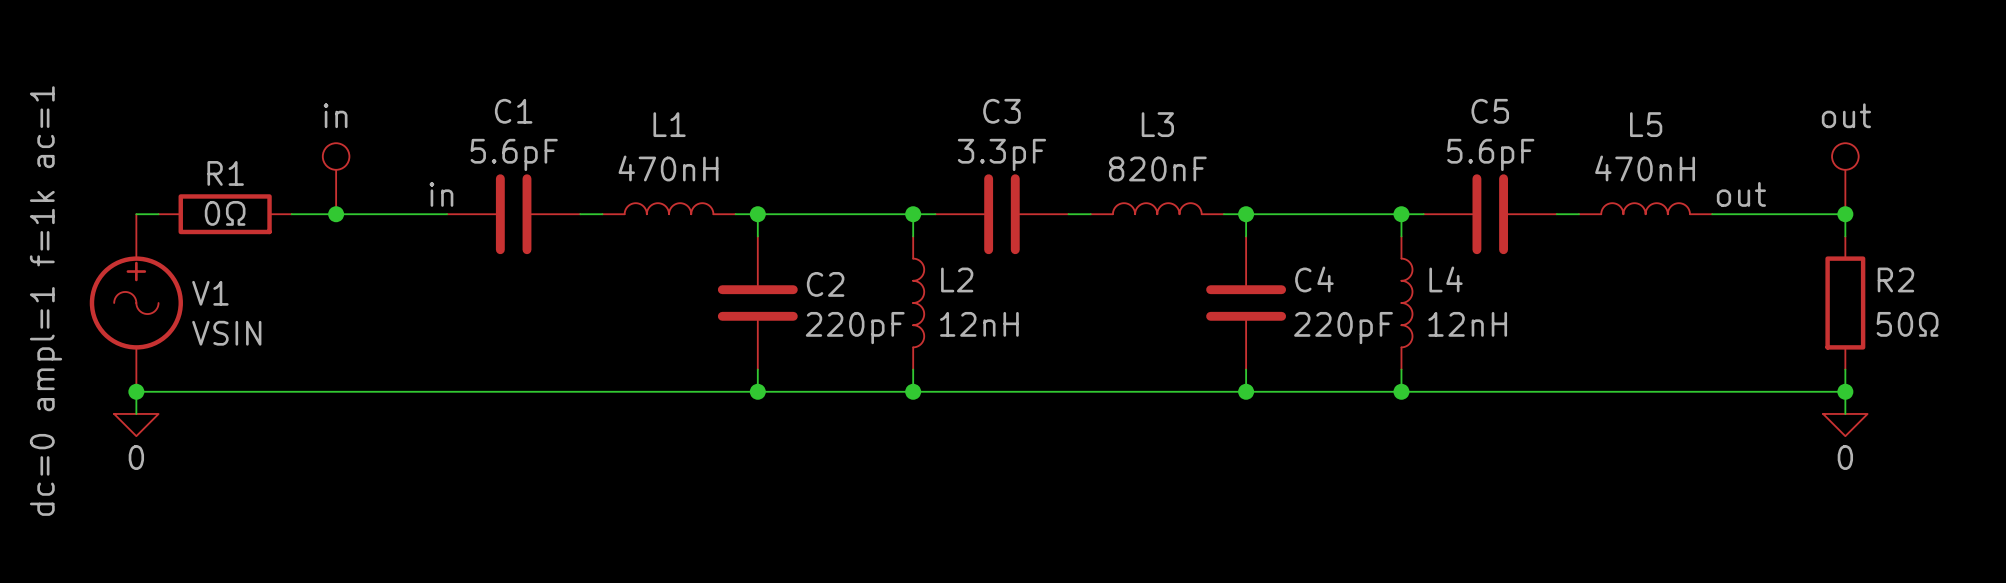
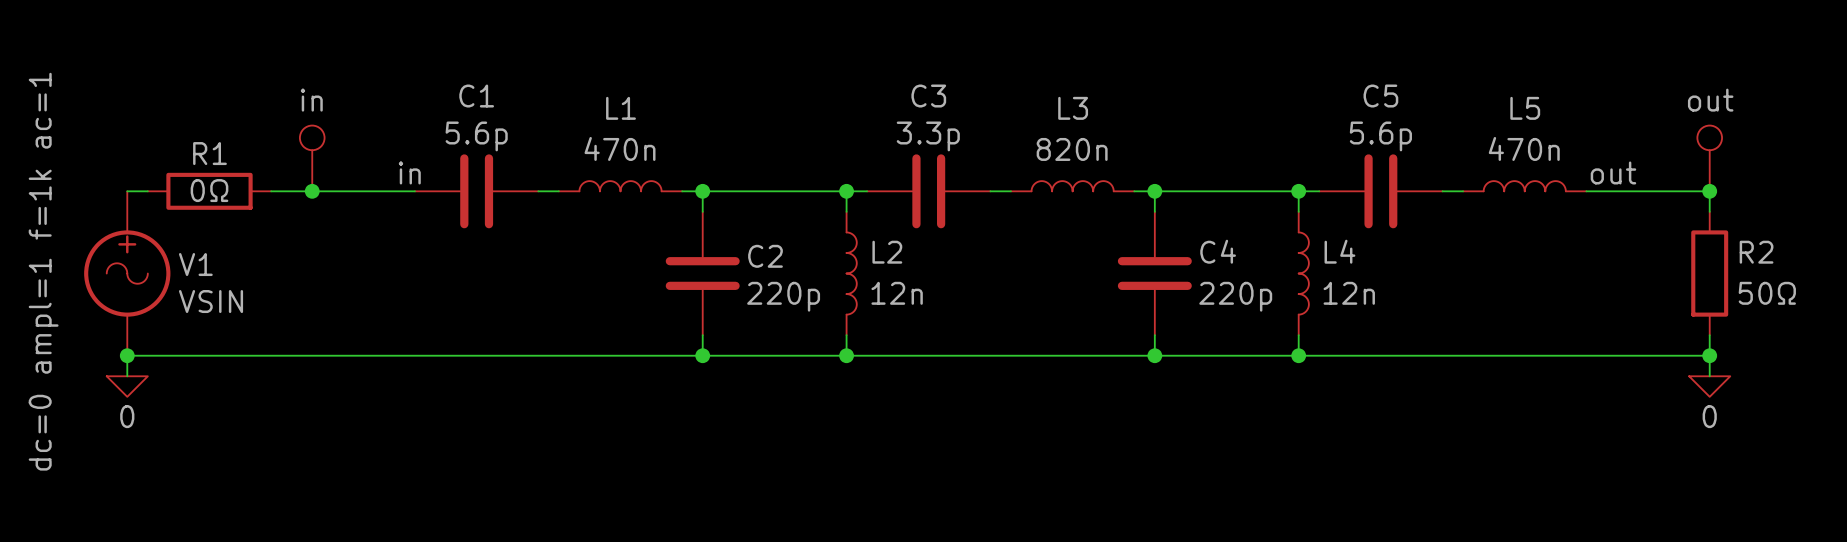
C1 value: 5.6pF (514, 154) -> 5.6p (476, 136)
C3 value: 3.3pF (1001, 154) -> 3.3p (928, 136)
C5 value: 5.6pF (1490, 154) -> 5.6p (1380, 136)
L1 value: 470nH (668, 168) -> 470n (620, 148)
L5 value: 470nH (1645, 168) -> 470n (1524, 148)
L3 value: 820nF (1157, 169) -> 820n (1072, 149)
L2 value: 12nH (979, 324) -> 12n (897, 293)
L4 value: 12nH (1467, 324) -> 12n (1349, 293)
C2 value: 220pF (855, 328) -> 220p (783, 296)
C4 value: 220pF (1343, 328) -> 220p (1235, 296)

